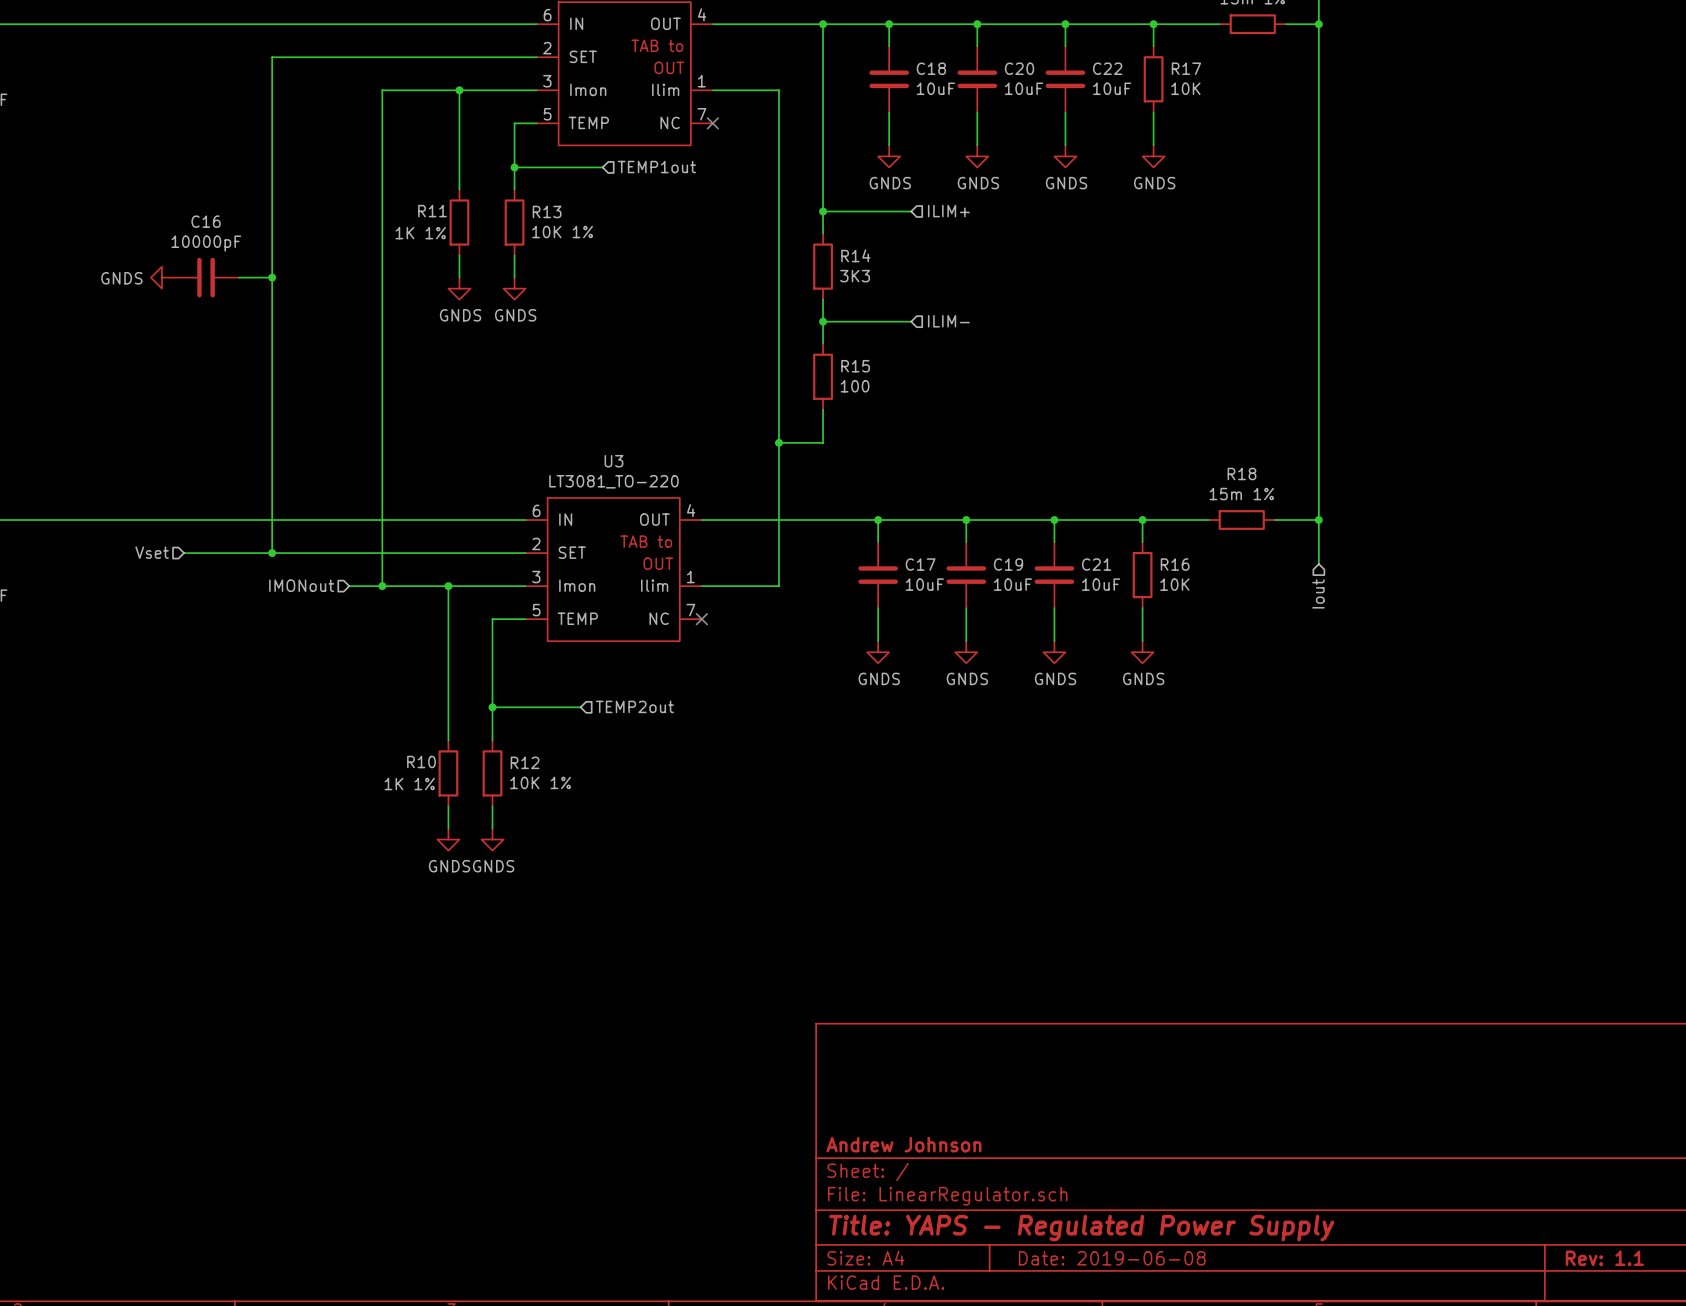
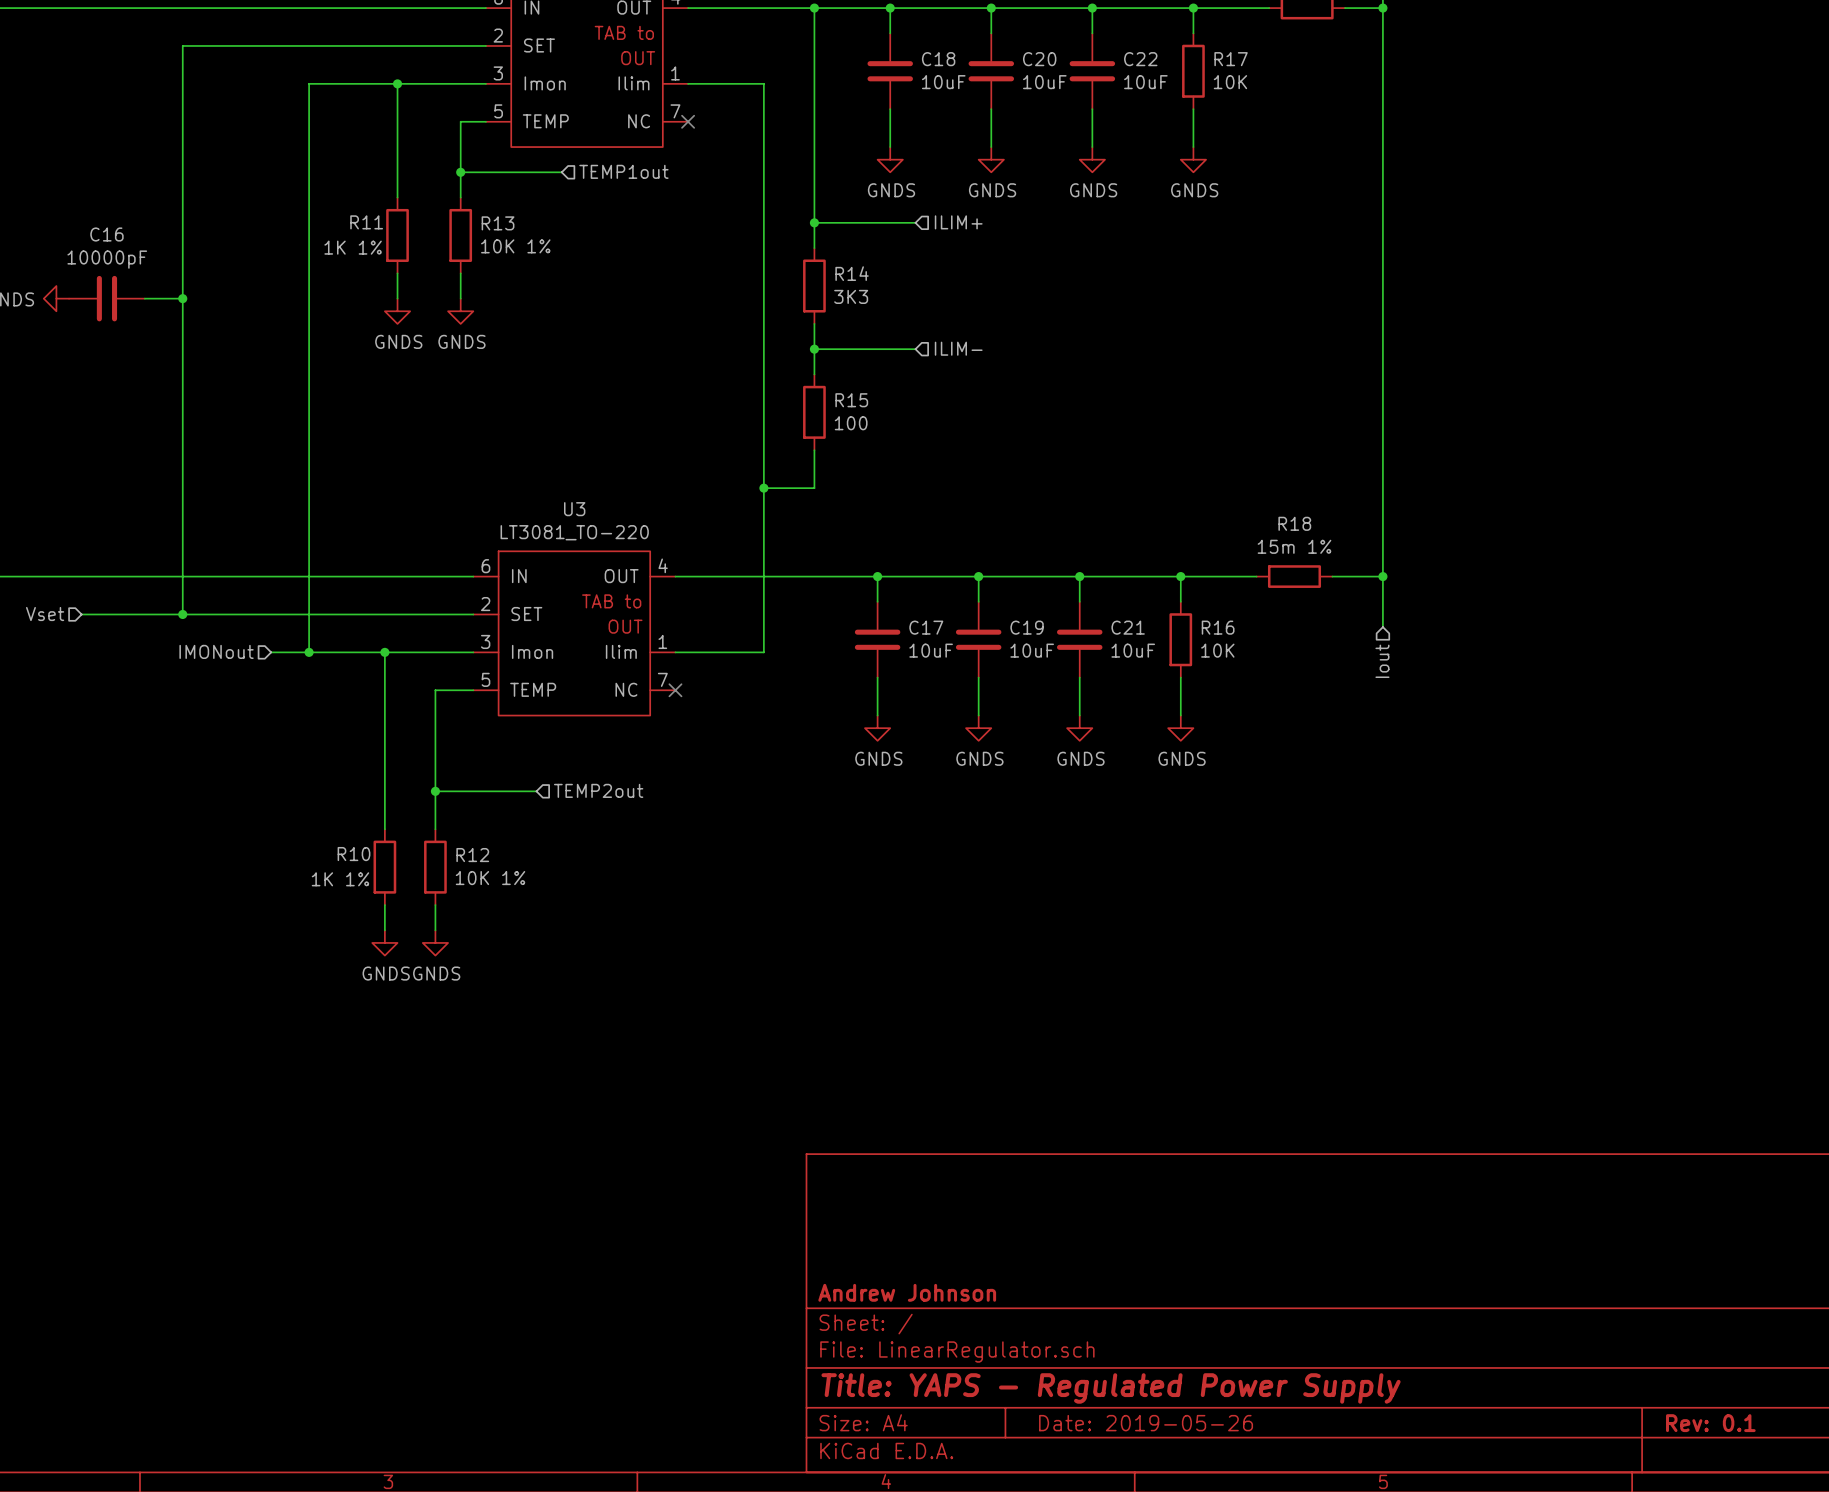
title block: Date: 2019-06-08 (1112, 1258) -> Date: 2019-05-26 (1146, 1423)
title block: Rev: 1.1 (1604, 1258) -> Rev: 0.1 (1710, 1423)

